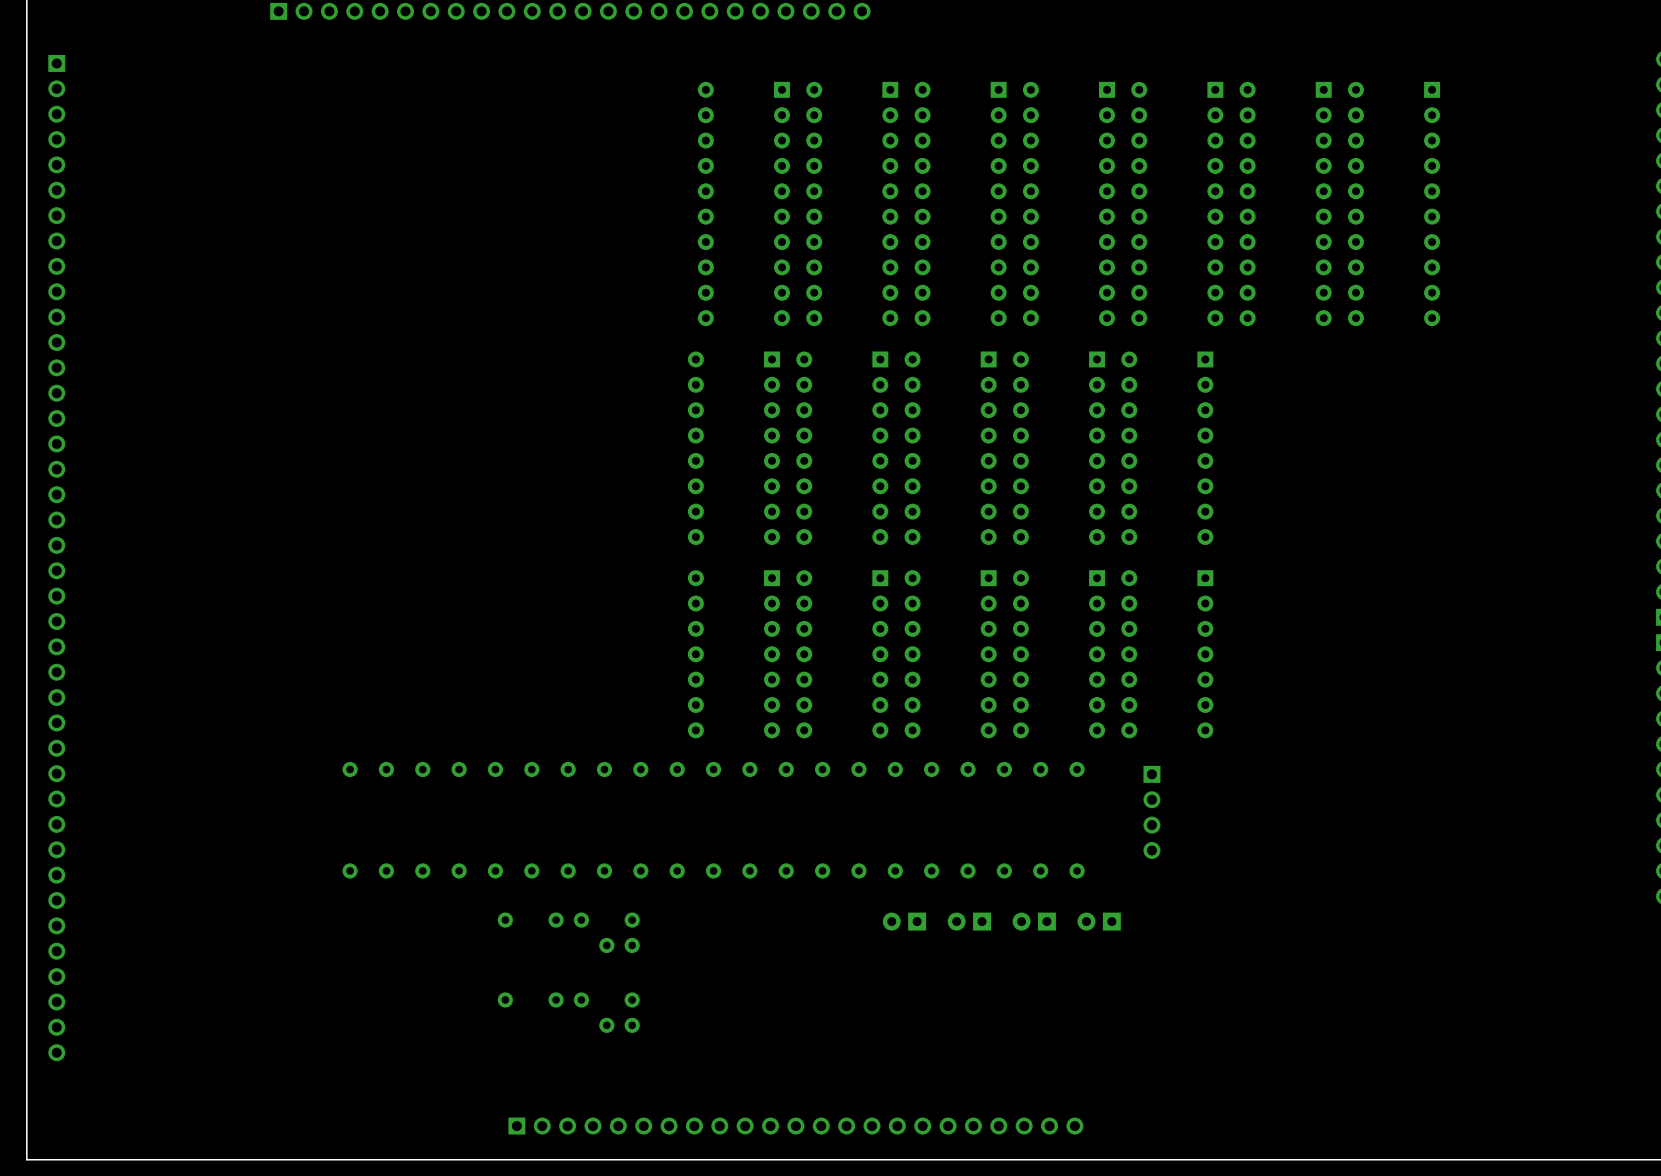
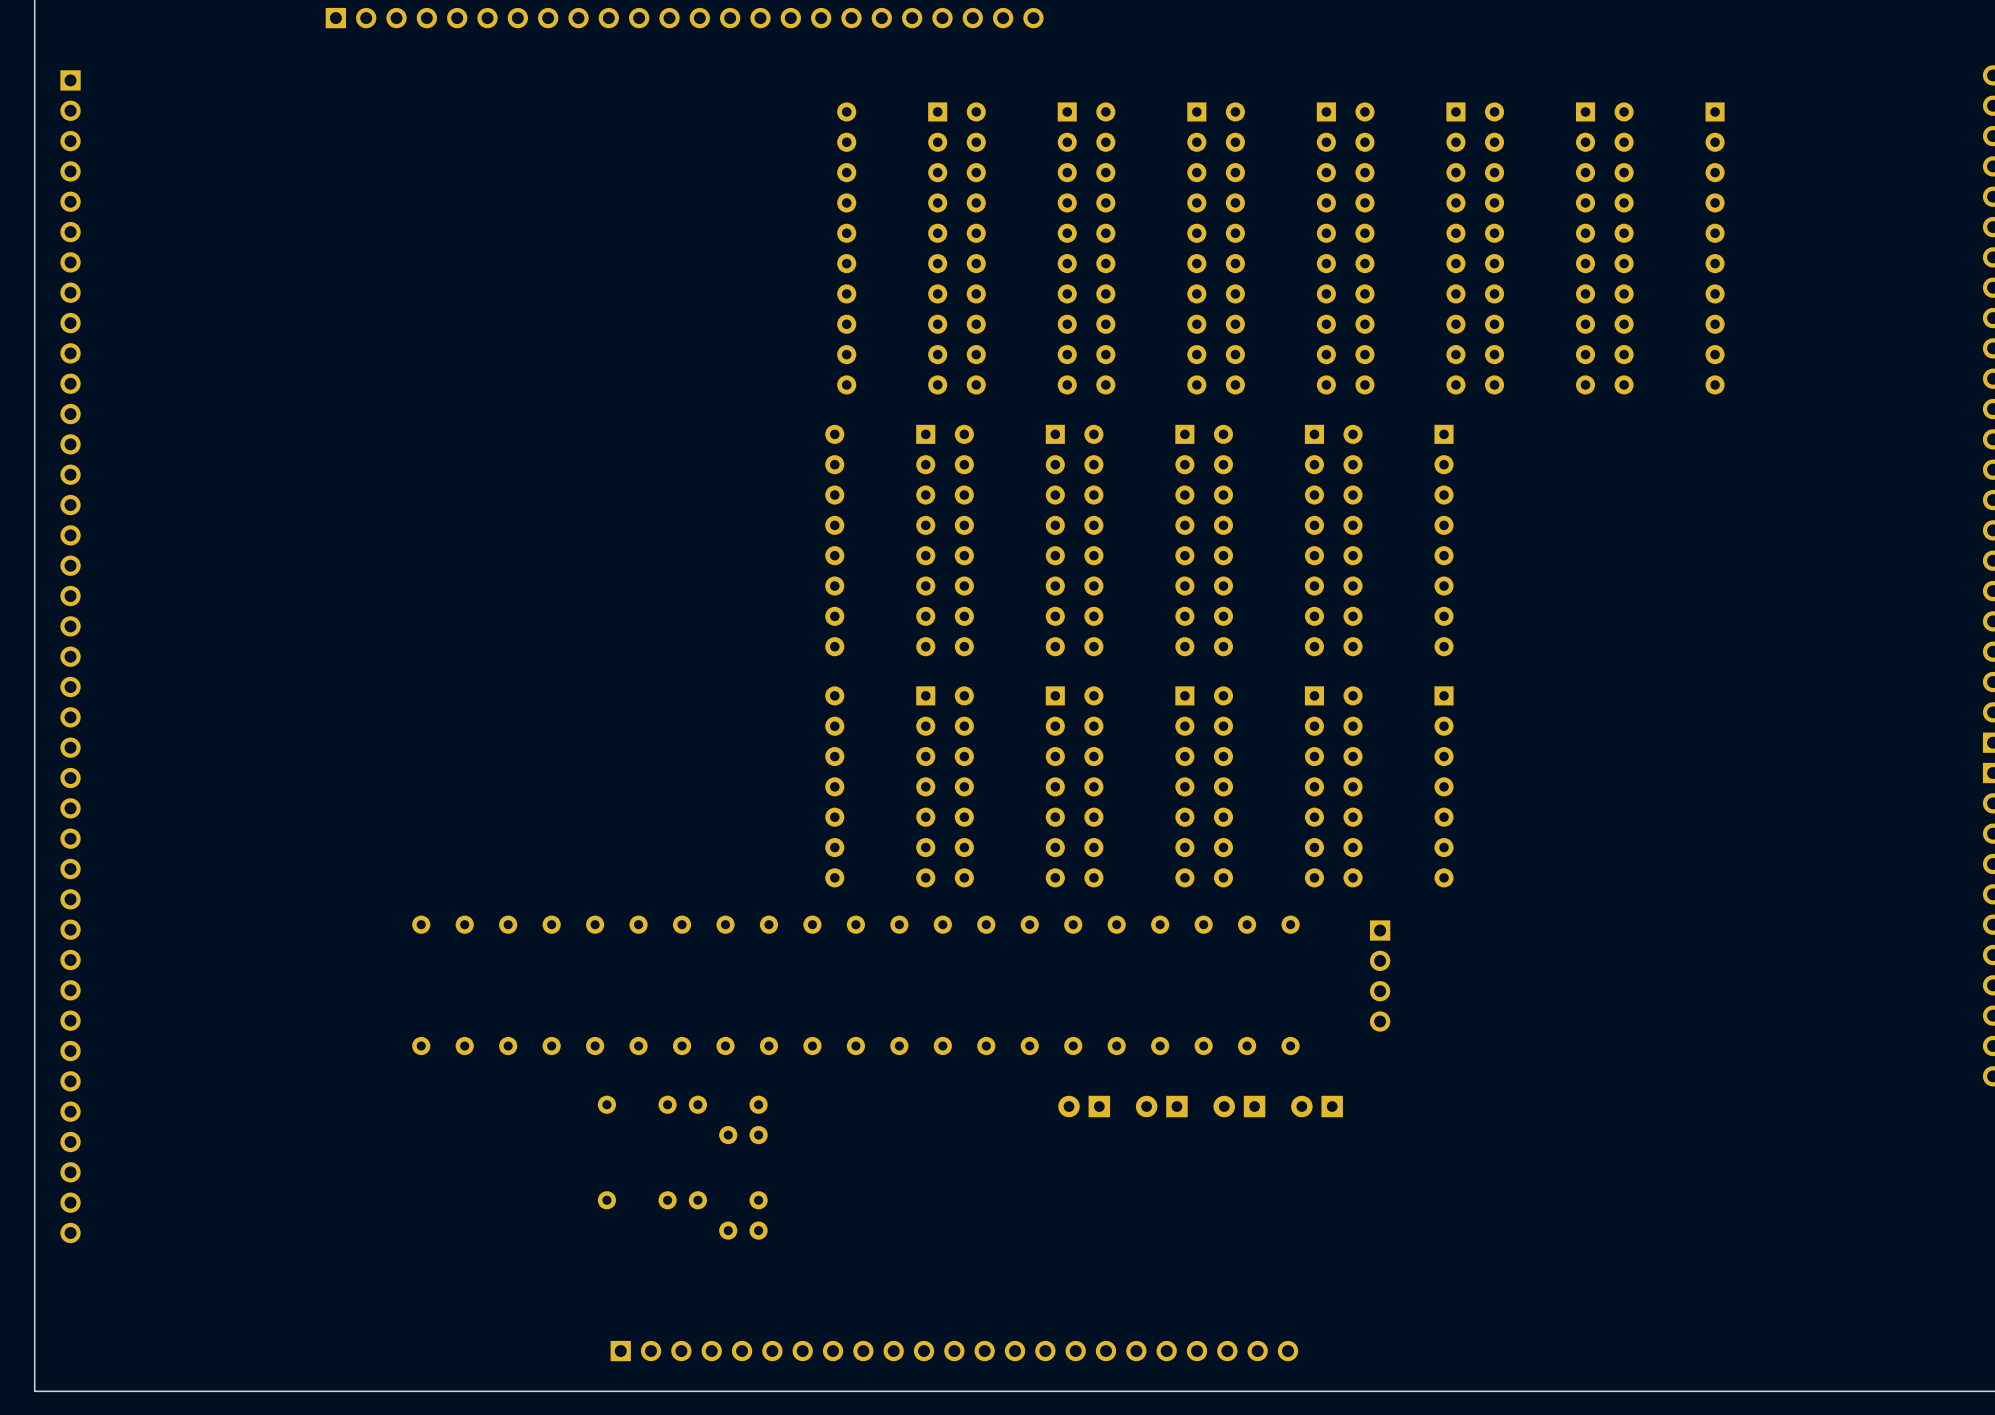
part: (56, 558) -> none

